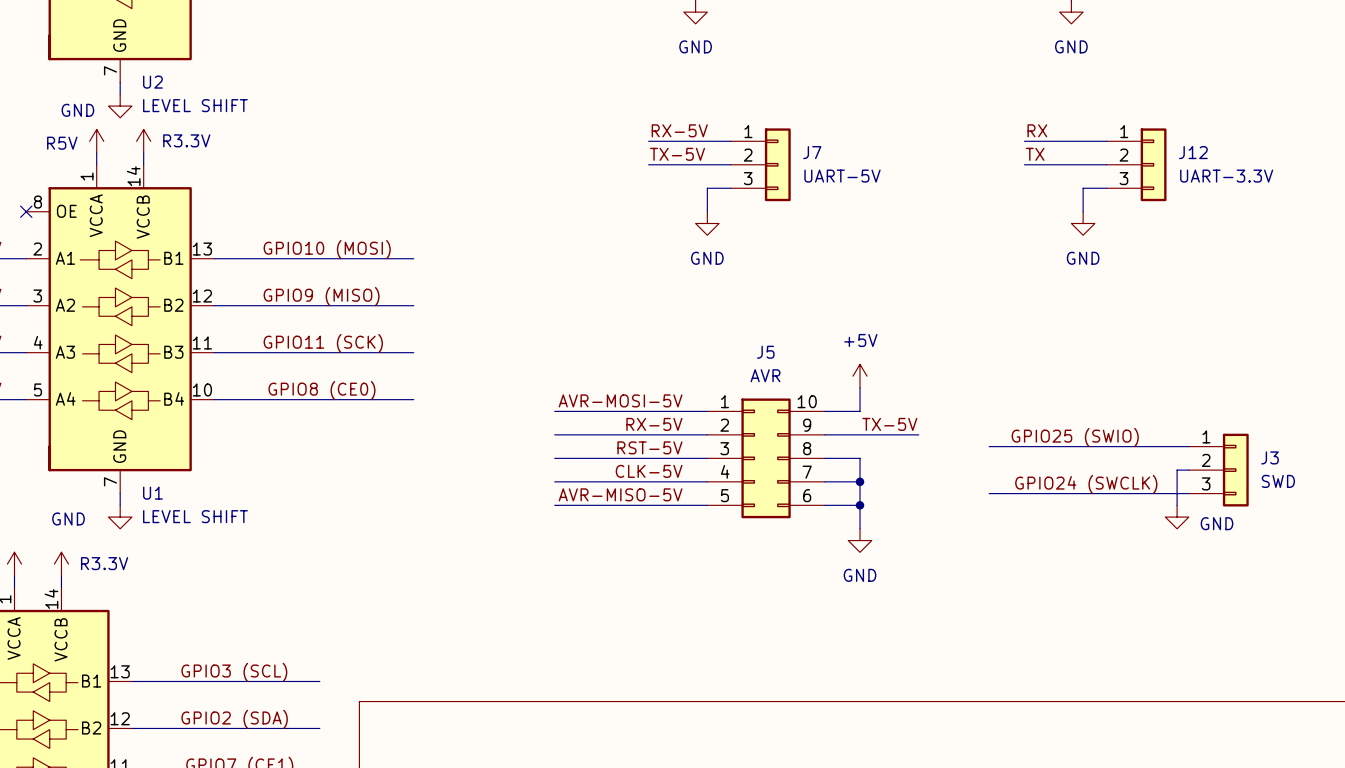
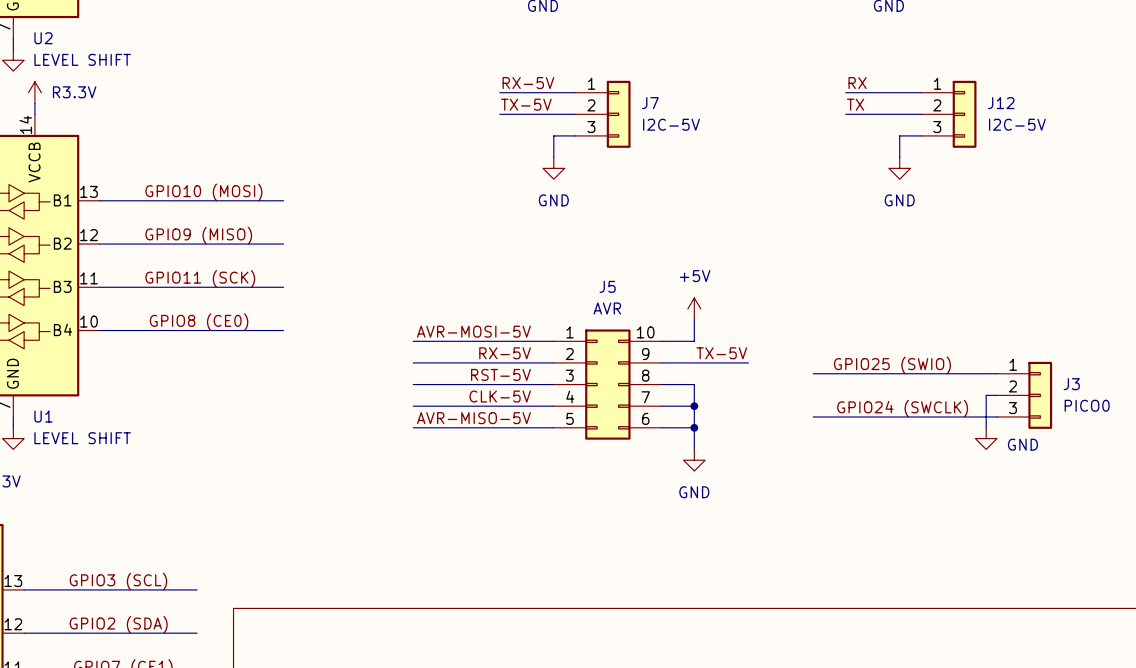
J7 value: UART-5V (842, 176) -> I2C-5V (671, 124)
J12 value: UART-3.3V (1226, 176) -> I2C-5V (1017, 124)
J3 value: SWD (1278, 481) -> PICO0 (1087, 405)

